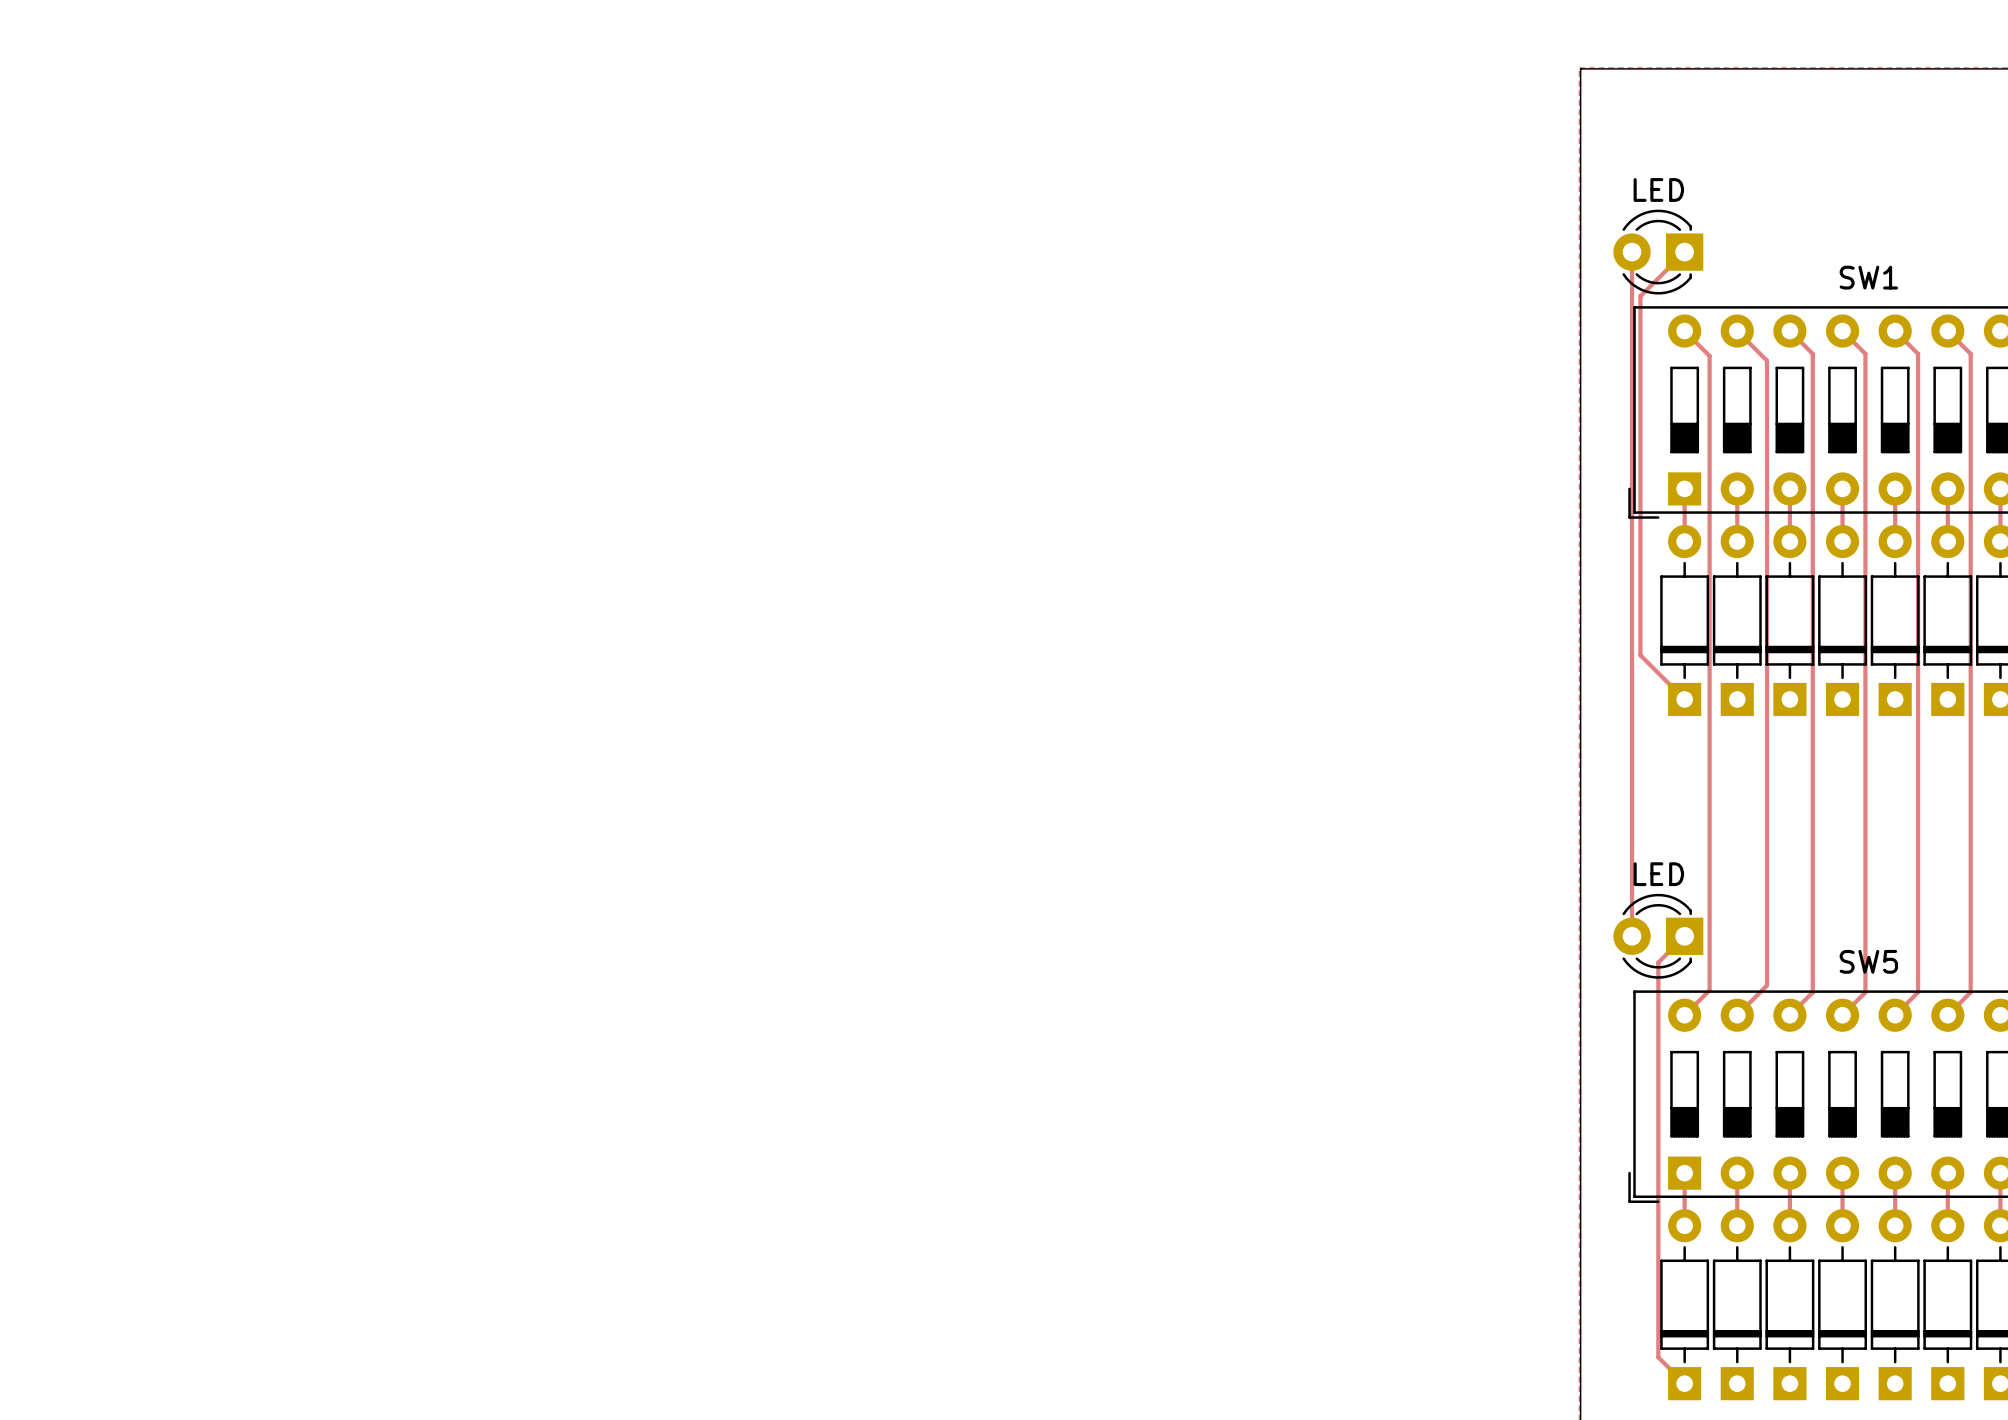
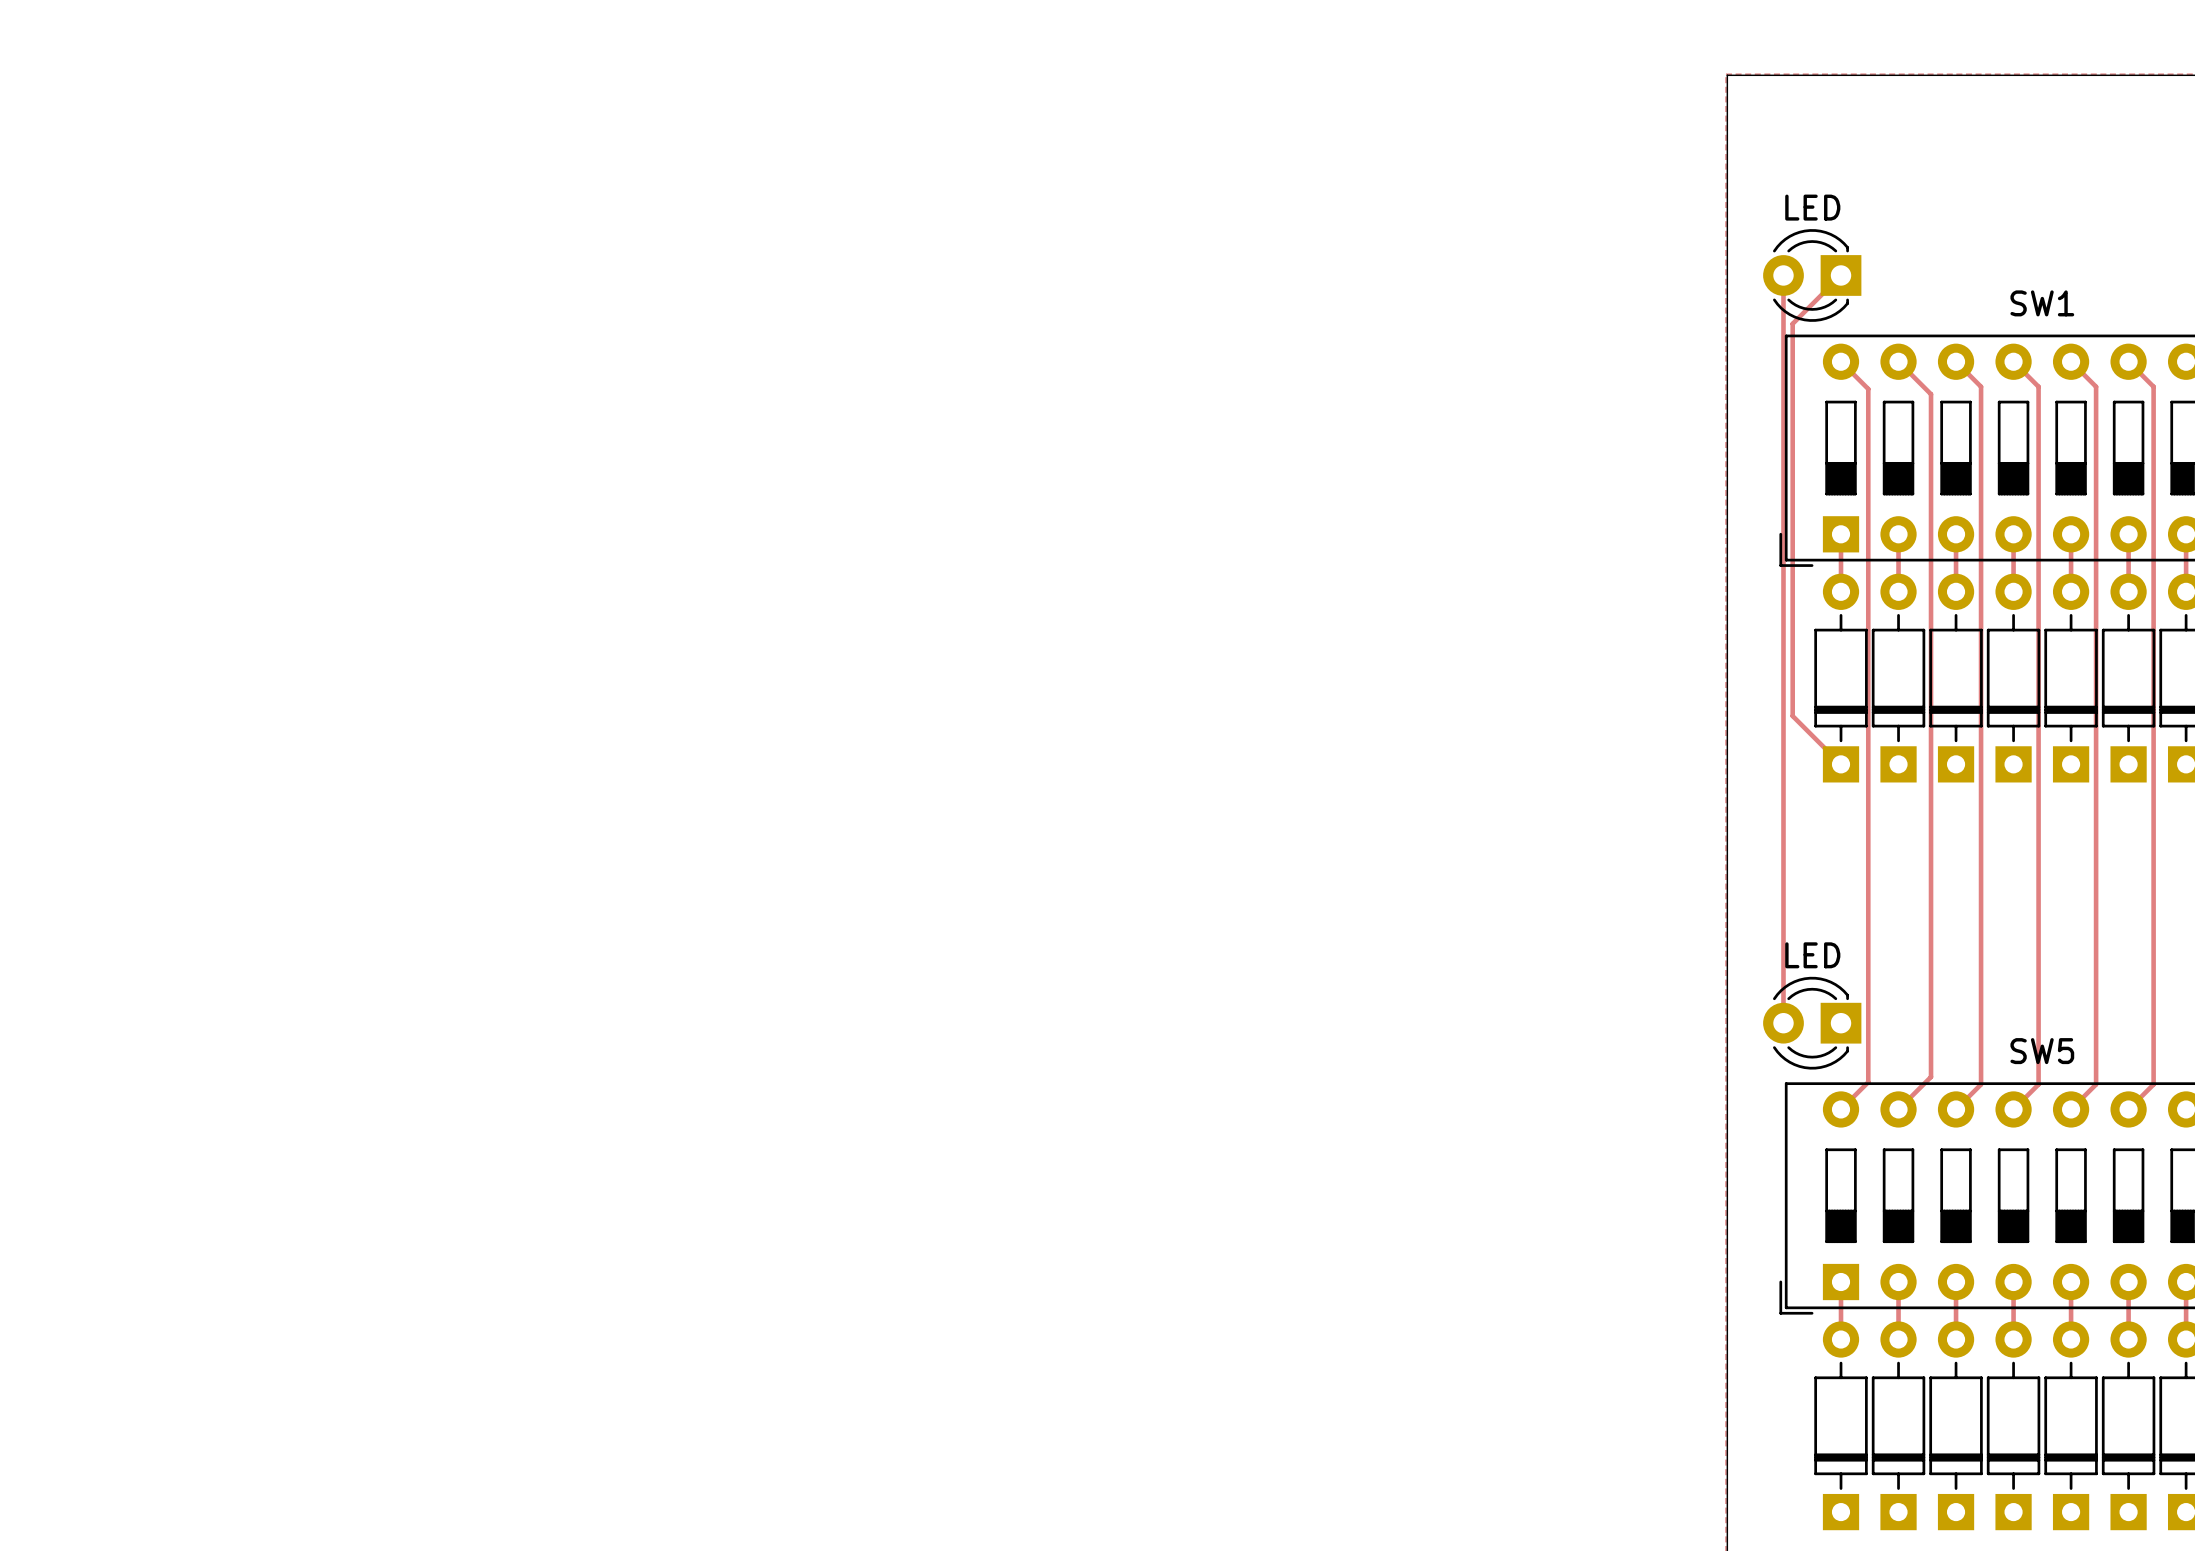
track: (1684, 936) (1658, 962) (1658, 1357) (1684, 1383) -> none

